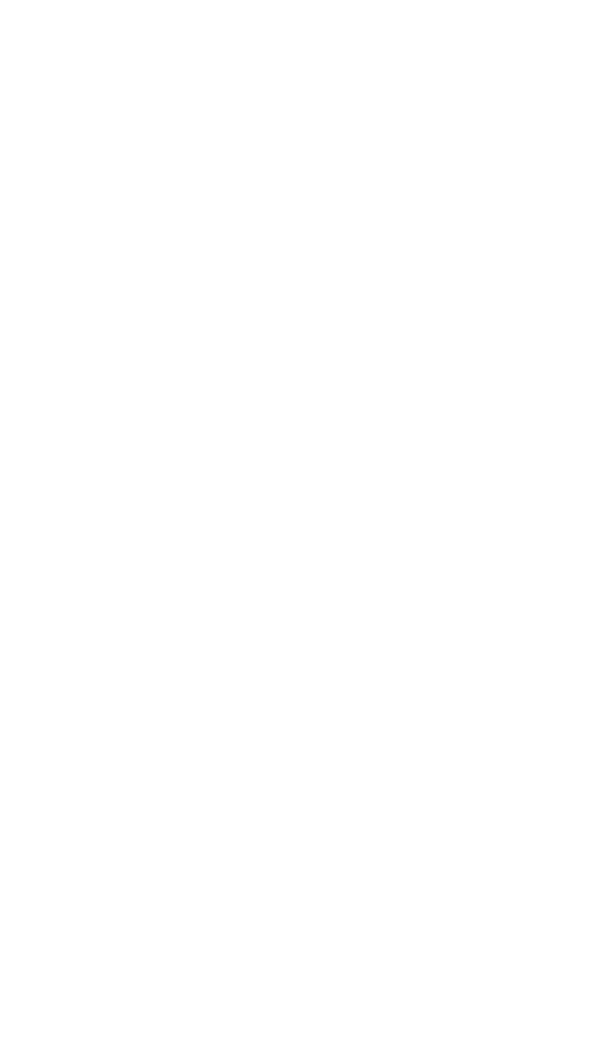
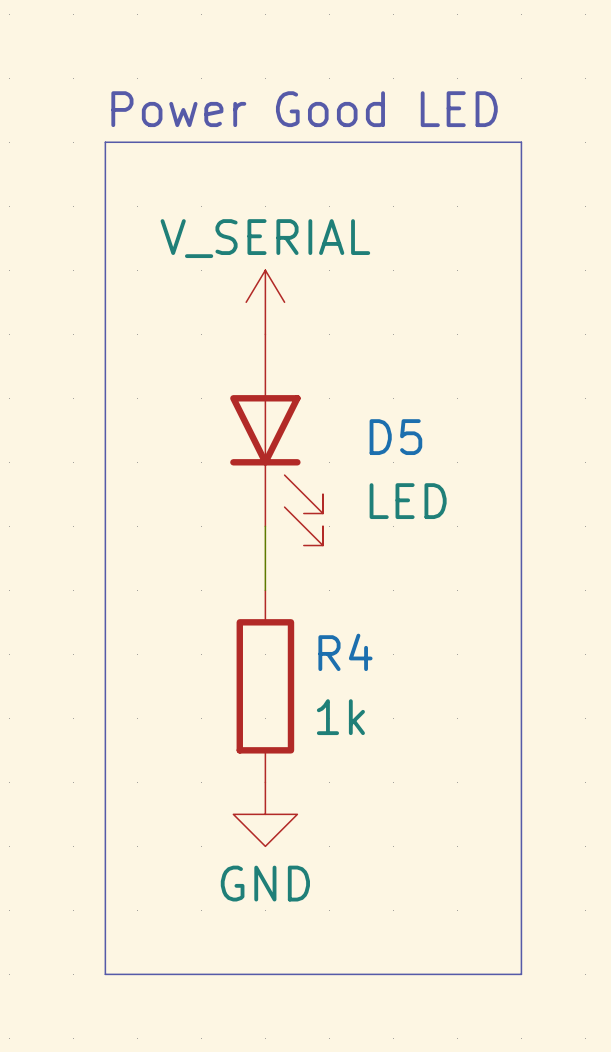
text: none -> Power Good LED (304, 109)
line: none -> (105, 142) (521, 142) (521, 974) (105, 974) (105, 142)
power symbol: none -> V_SERIAL (265, 302)
D5: none -> LED (276, 439)
wire: none -> (265, 526) (265, 590)
R4: none -> 1k (265, 686)
power symbol: none -> GND (265, 814)

